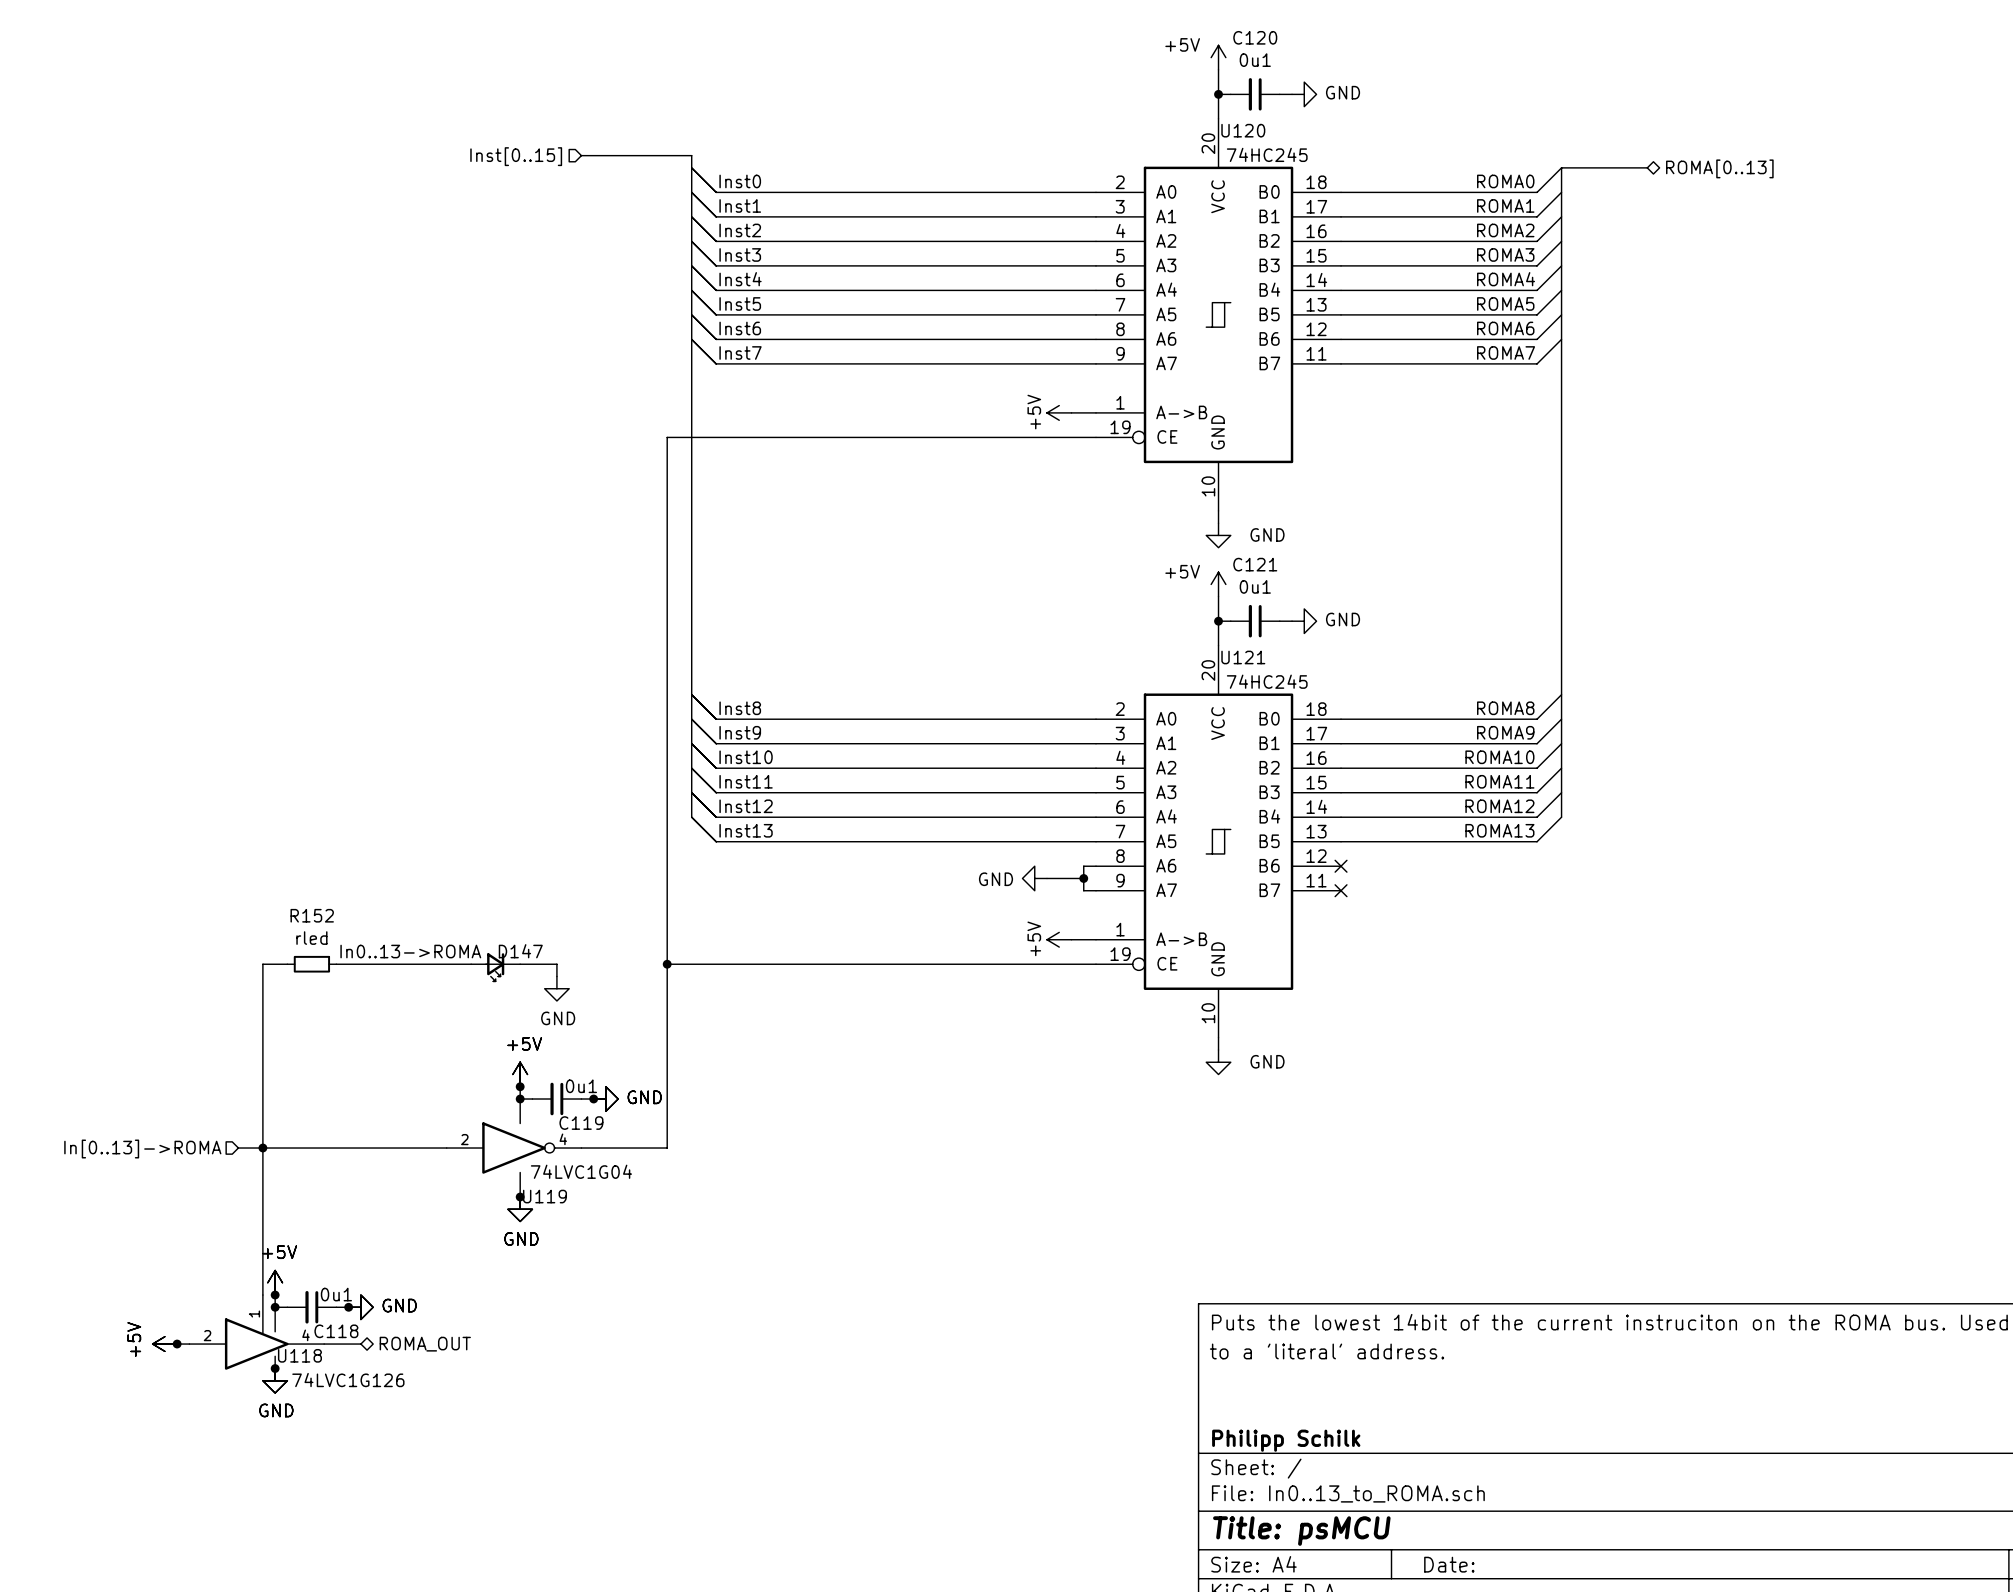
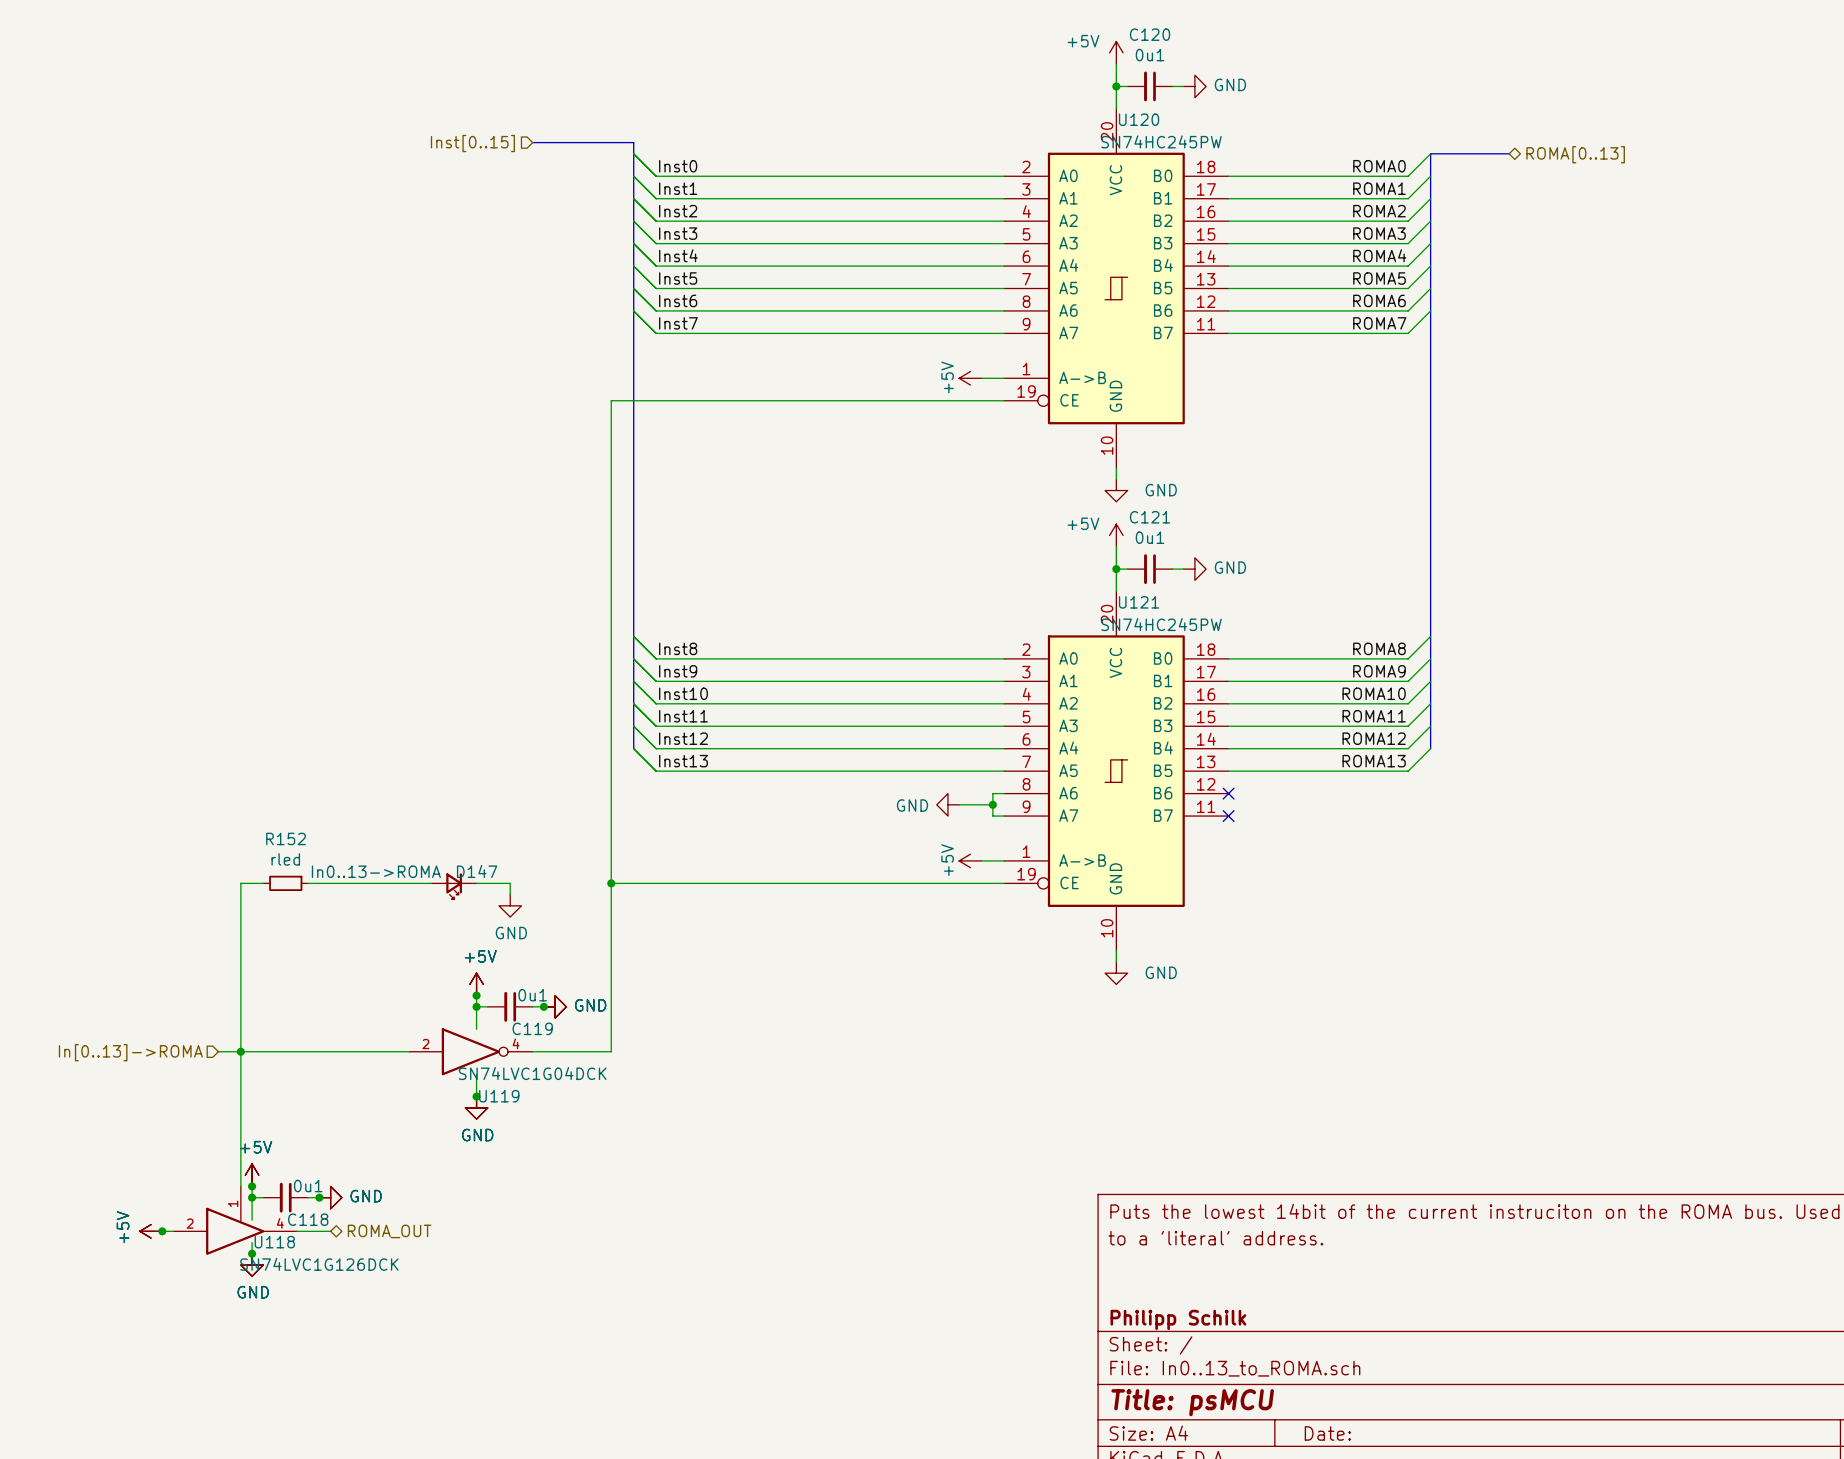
U120 value: 74HC245 (1267, 154) -> SN74HC245PW (1161, 141)
U121 value: 74HC245 (1267, 681) -> SN74HC245PW (1161, 624)
U119 value: 74LVC1G04 (581, 1171) -> SN74LVC1G04DCK (532, 1073)
U118 value: 74LVC1G126 (348, 1380) -> SN74LVC1G126DCK (319, 1264)

